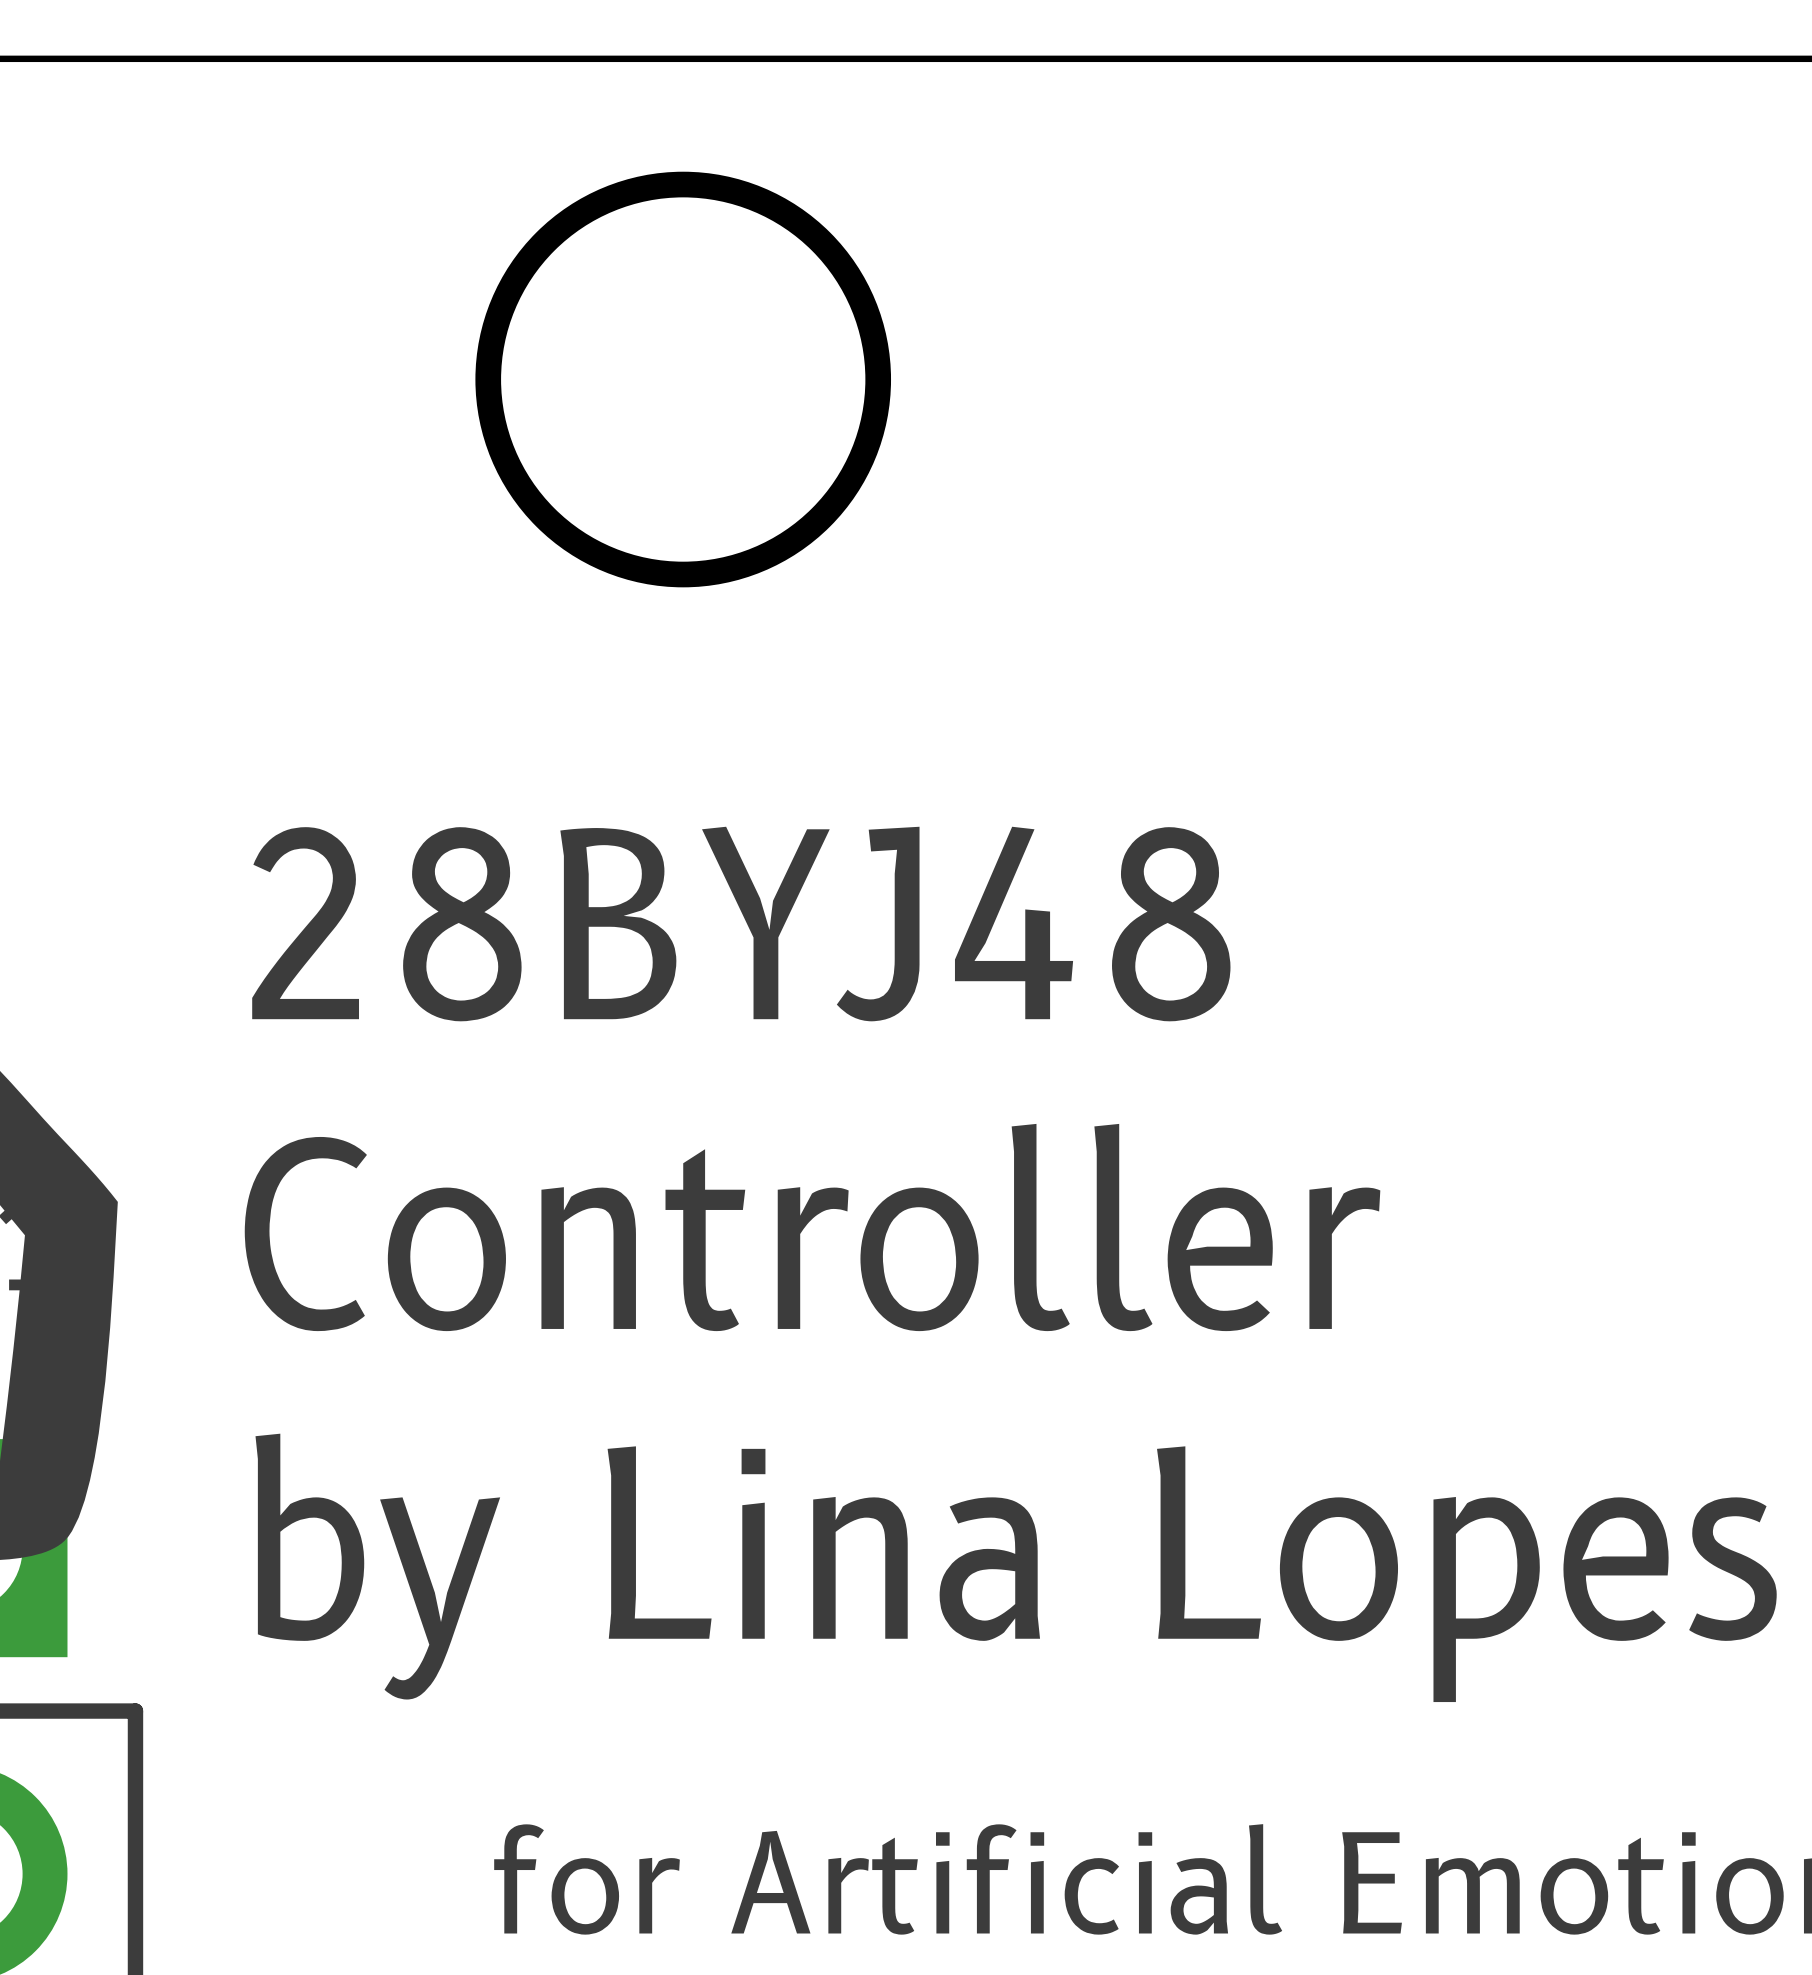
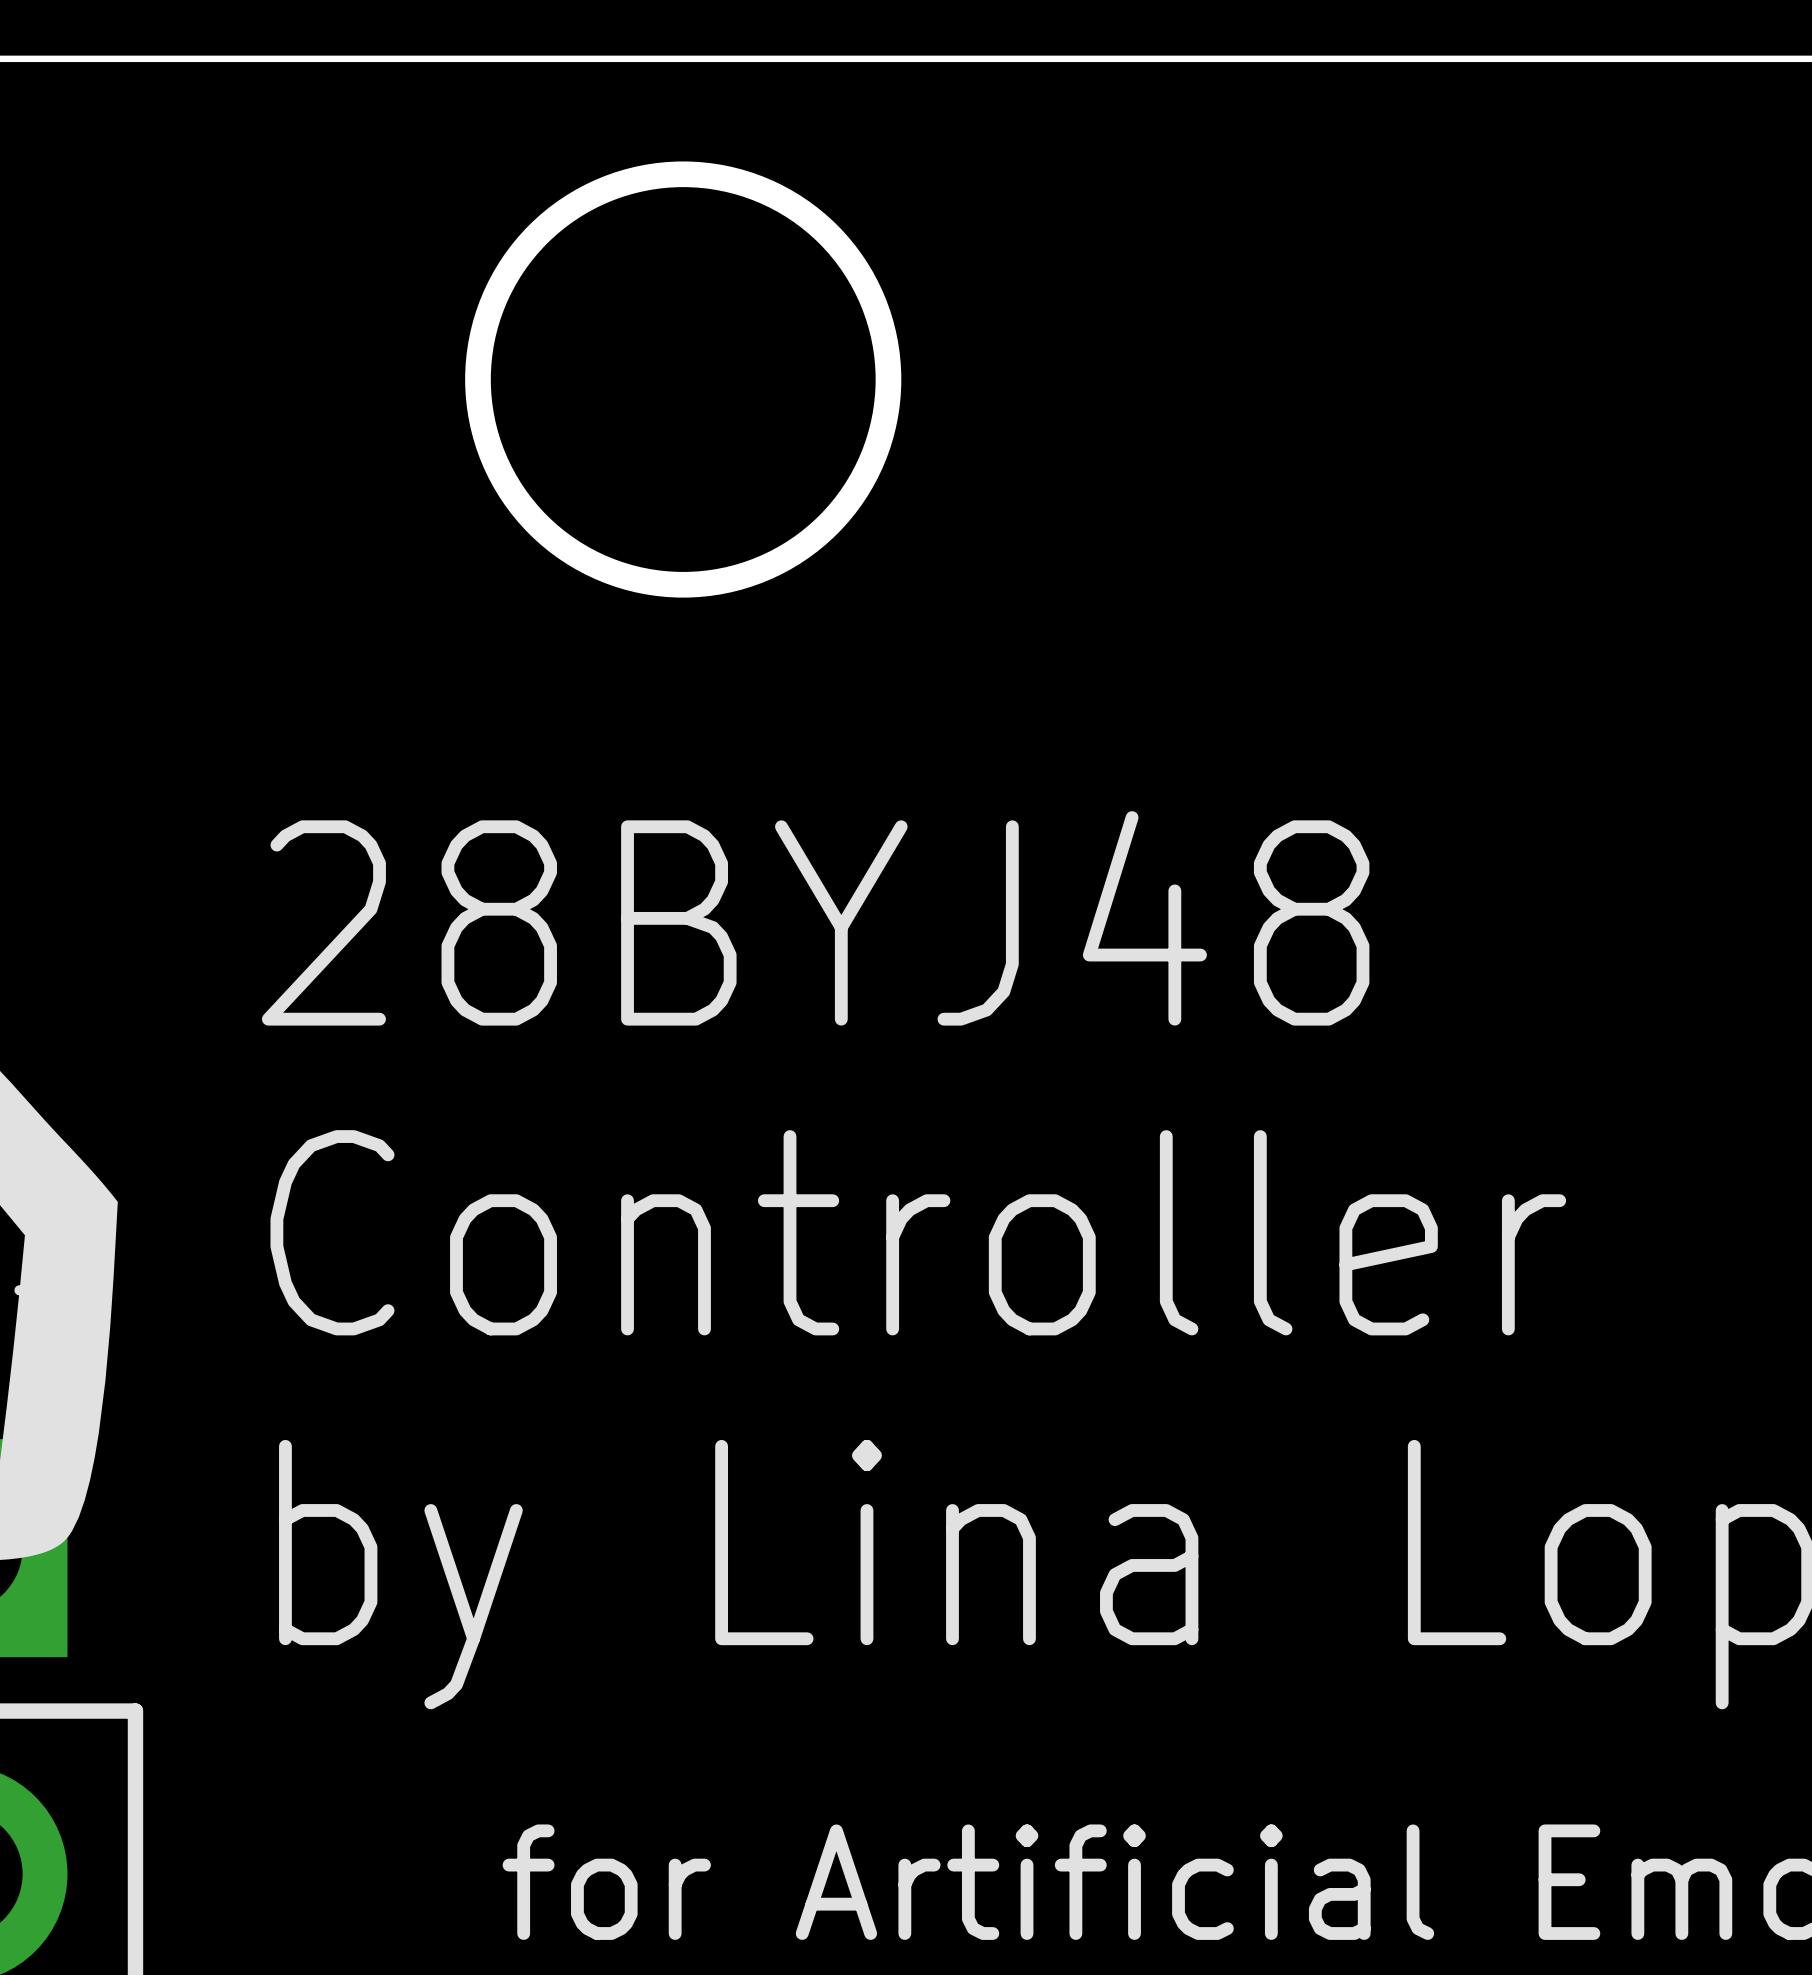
round board edge size: [475, 171, 892, 588] -> [465, 161, 902, 598]

